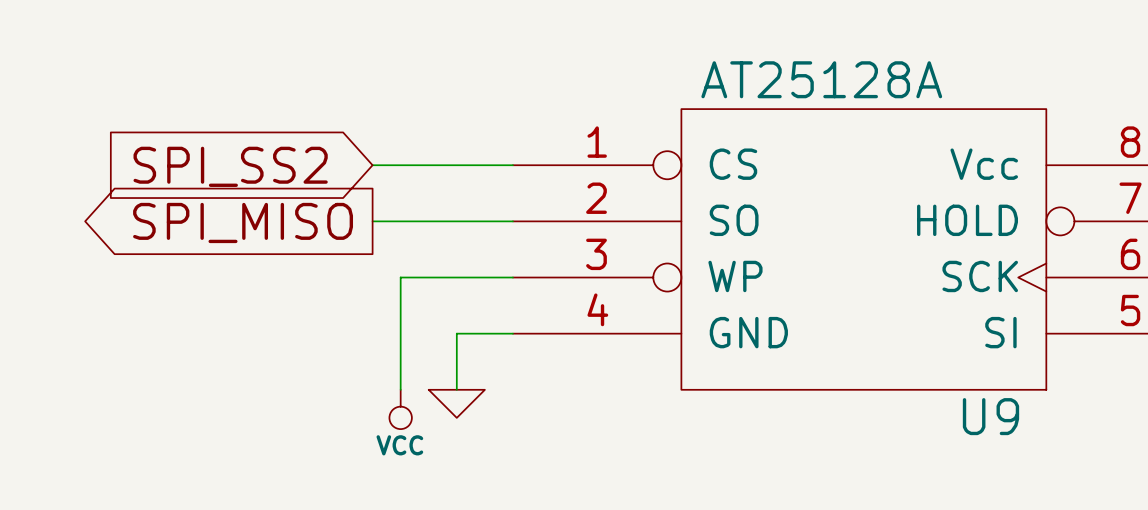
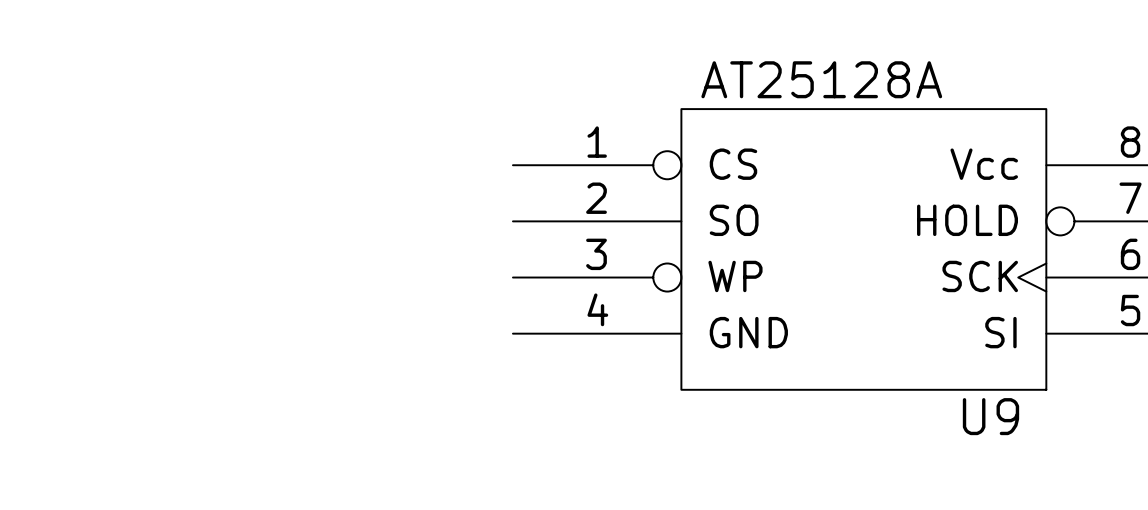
wire: (372, 165) (512, 165) -> none
global label: SPI_SS2 (230, 166) -> none
wire: (372, 221) (512, 221) -> none
global label: SPI_MISO (243, 222) -> none
wire: (512, 277) (400, 277) (400, 389) -> none
wire: (512, 333) (456, 333) (456, 389) -> none
power symbol: (456, 403) -> none
power symbol: VCC (400, 409) -> none

